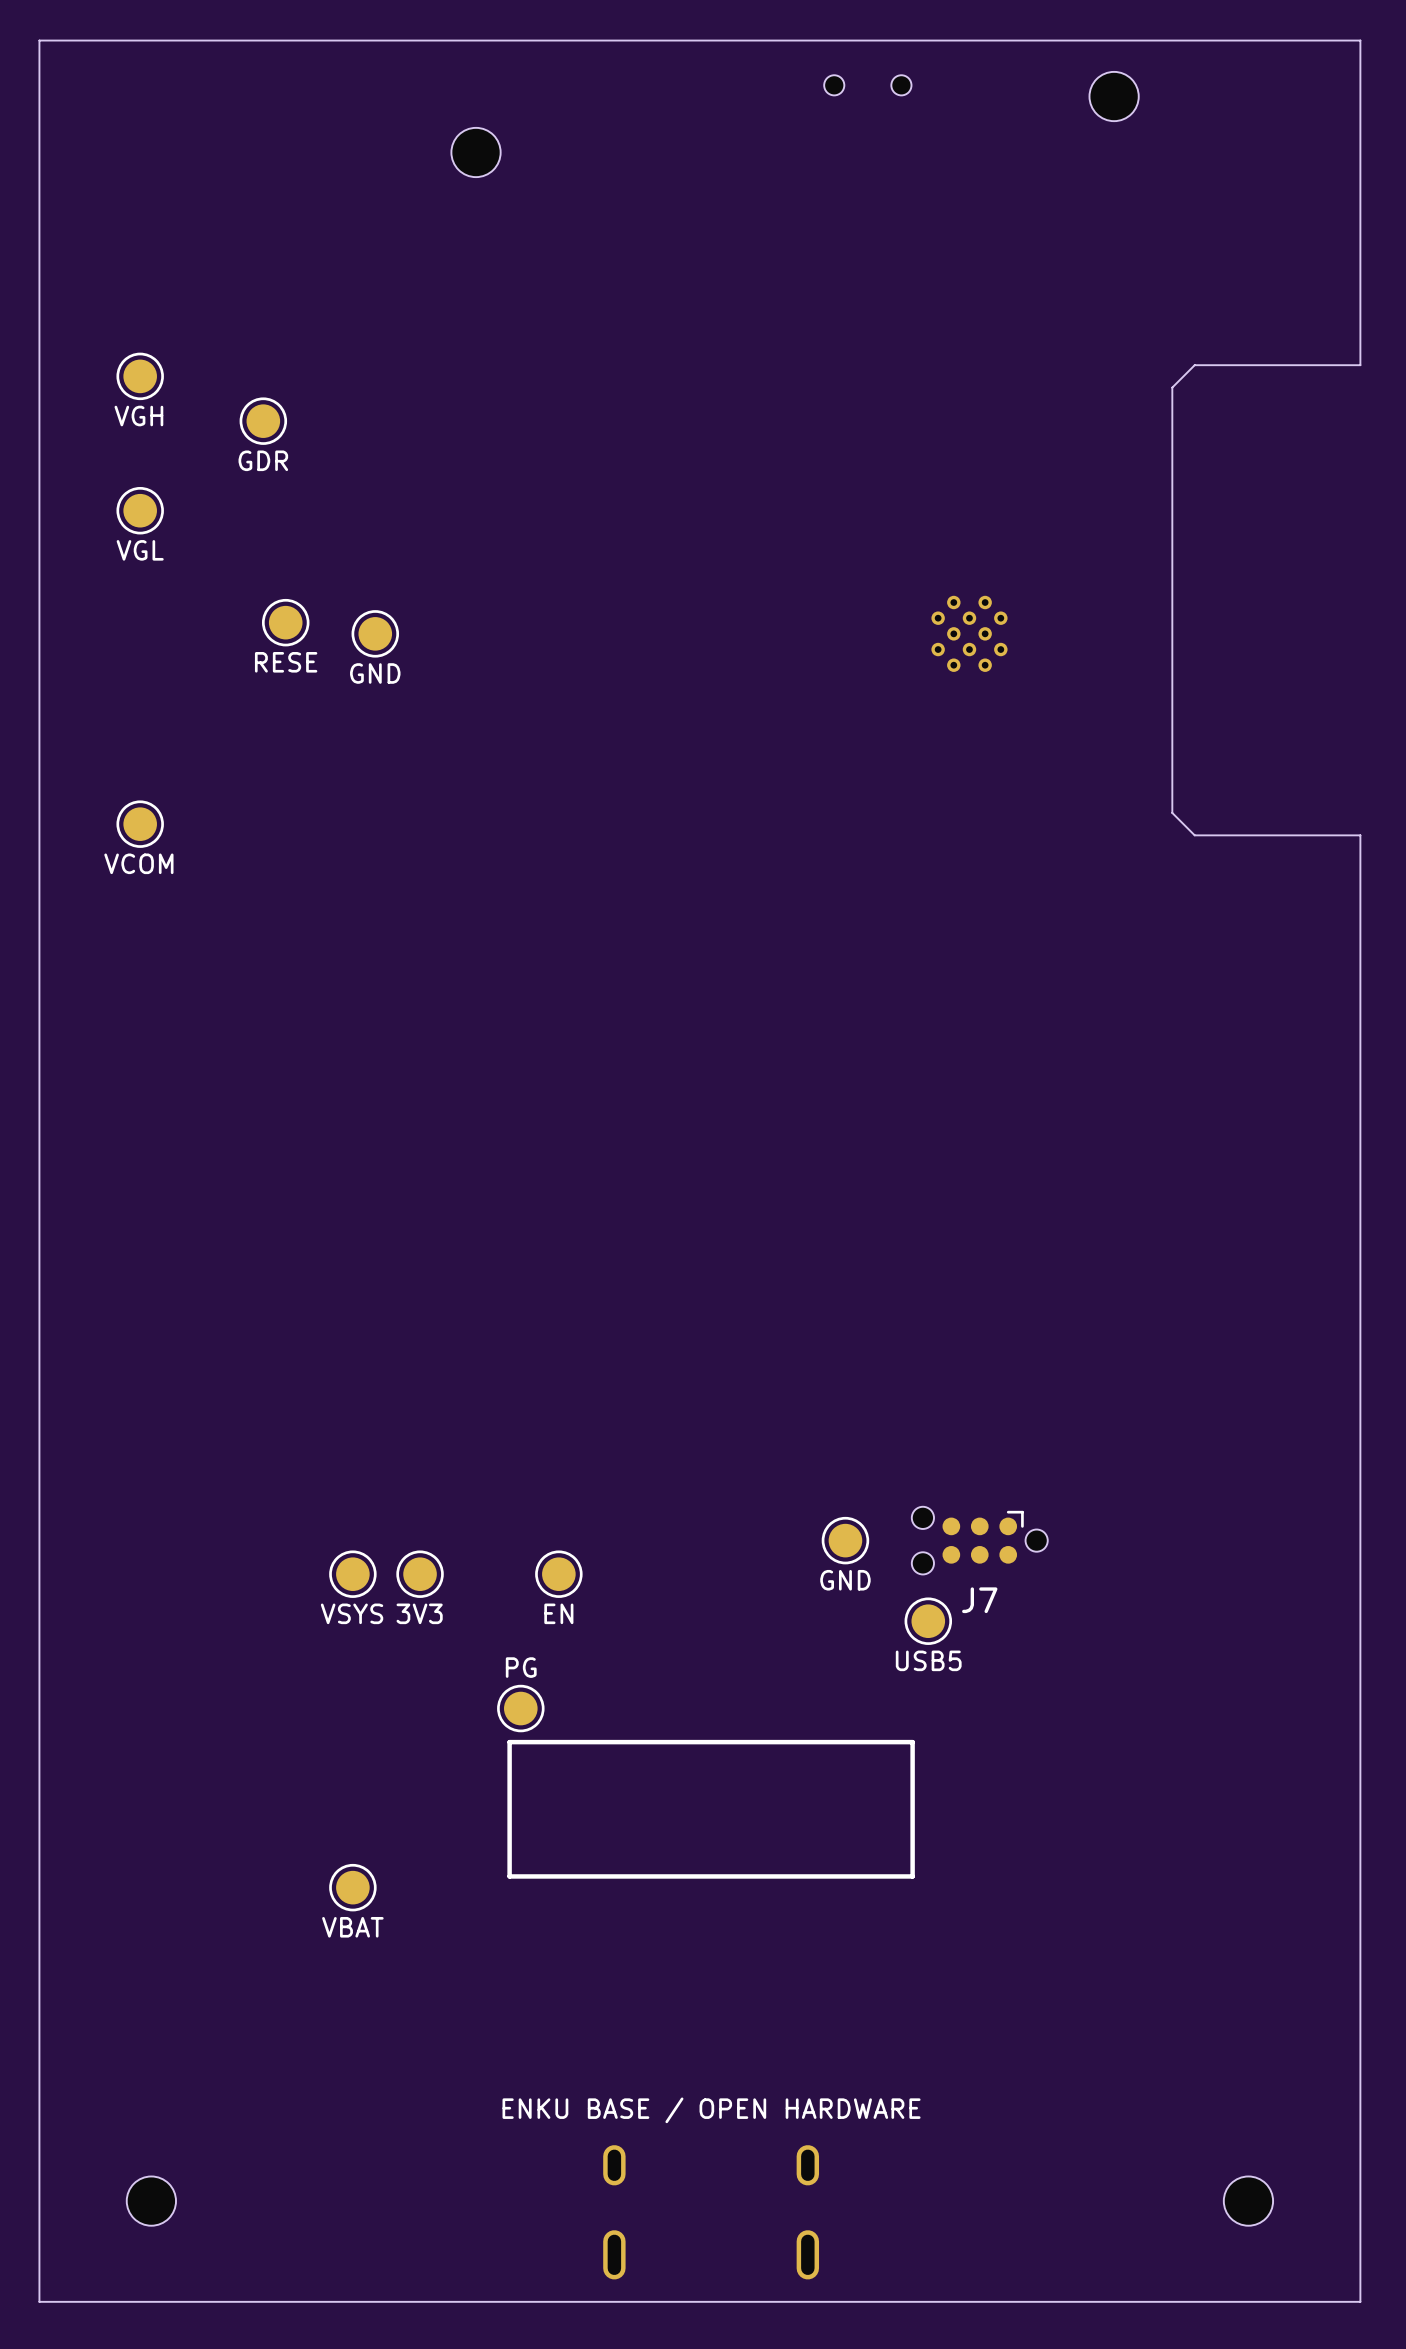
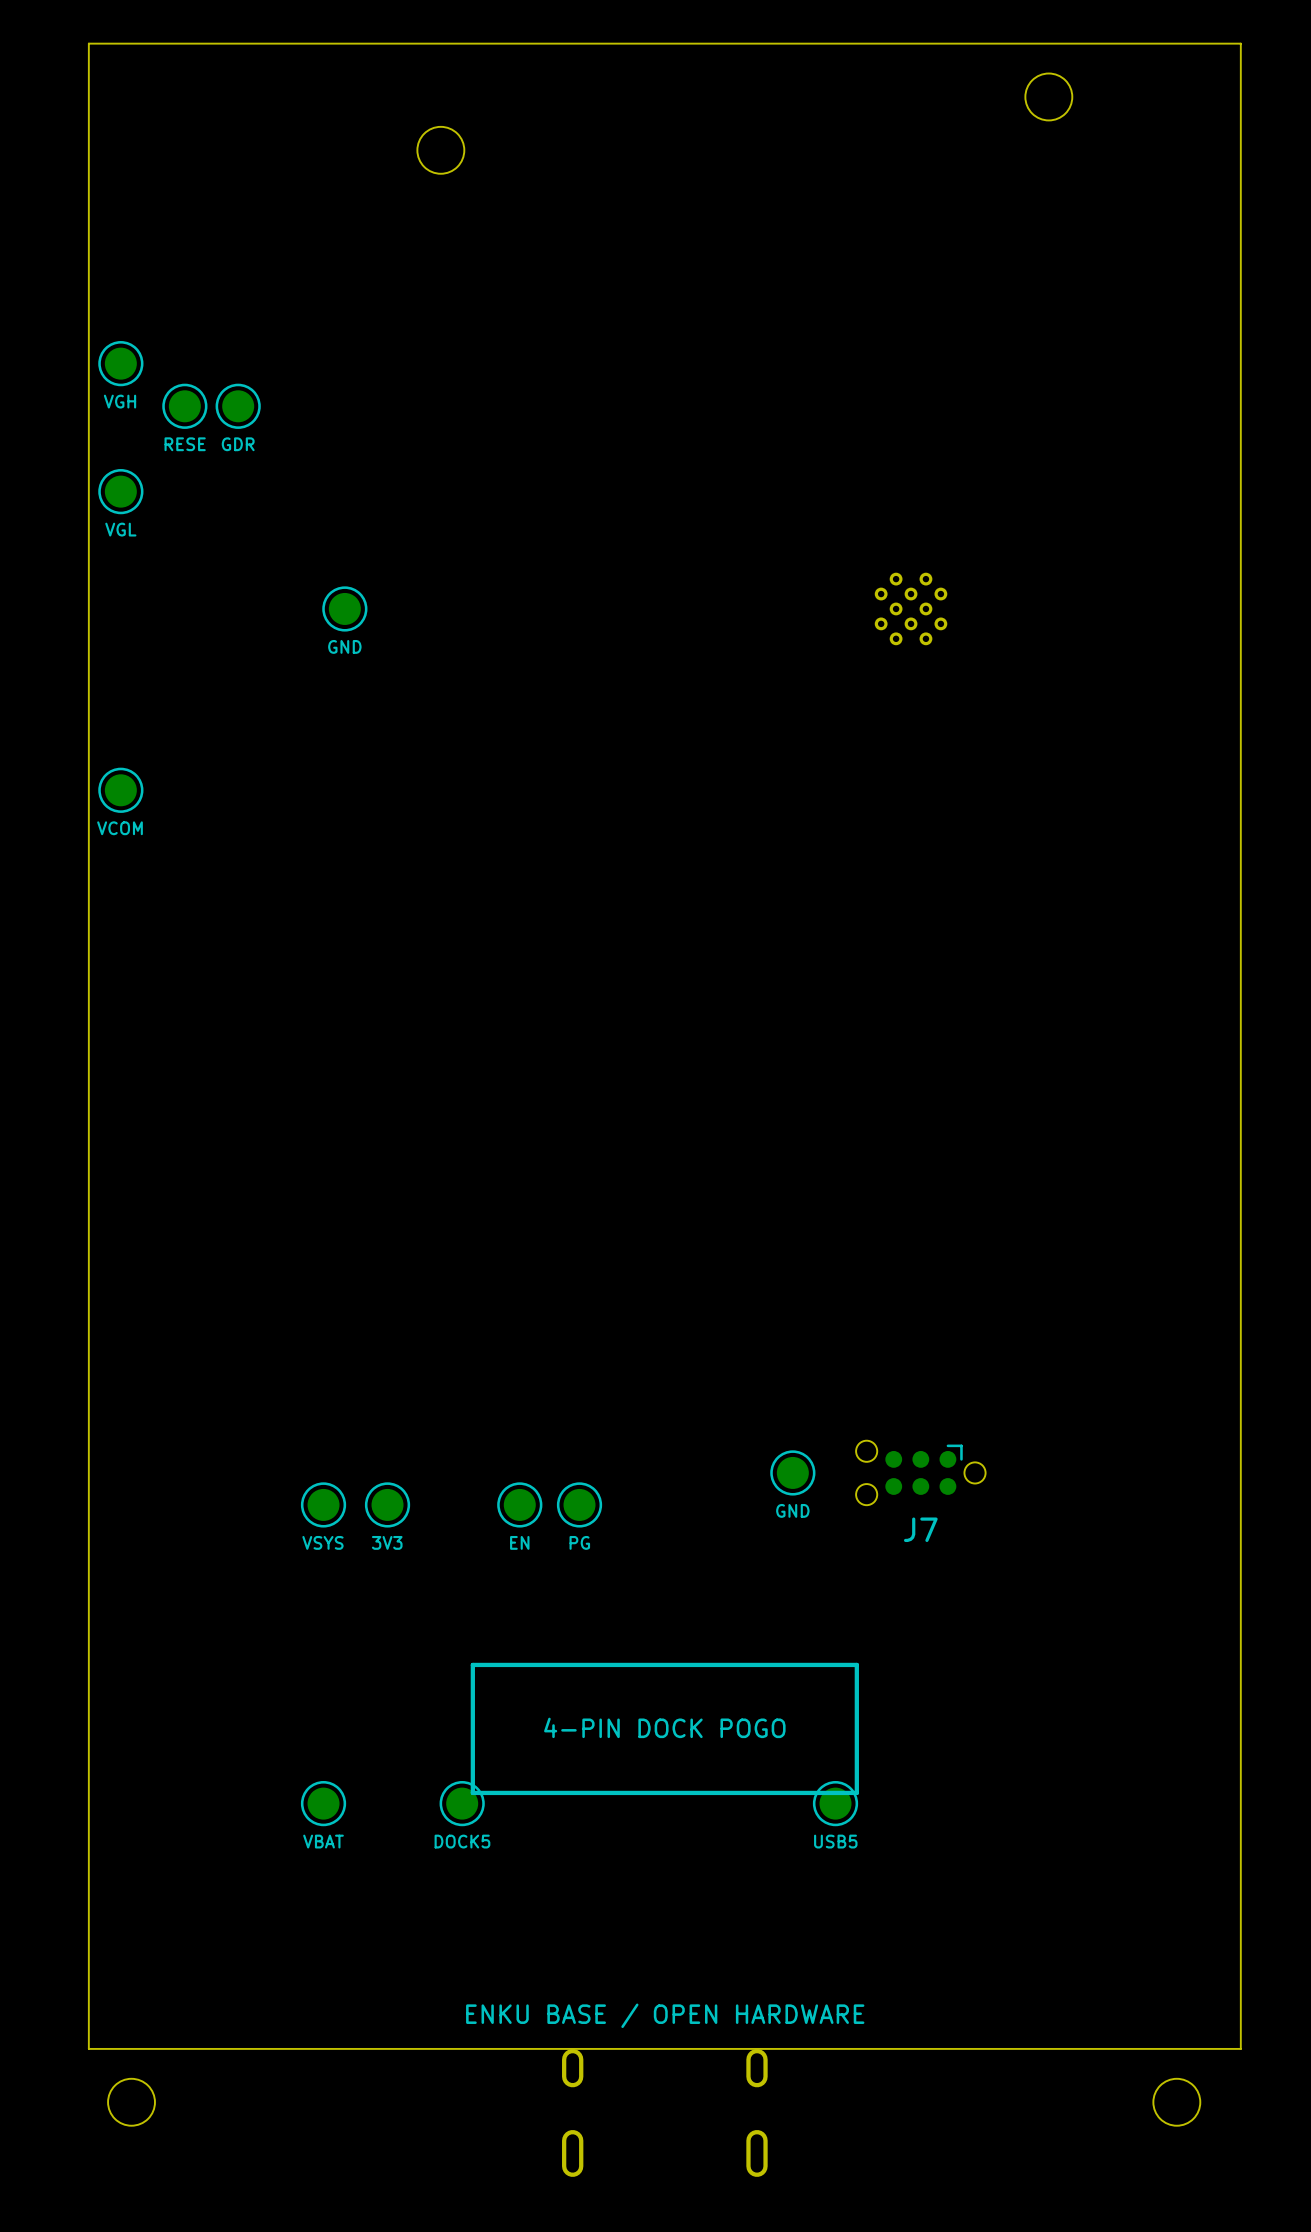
board edge: (1315, 40) (1360, 40) (1360, 365) (1194, 365) (1172, 387) (1172, 812) (1194, 835) (1360, 835) (1360, 2301) (39, 2301) (39, 40) (106, 40) -> (1240, 43) (1240, 2048) (88, 2048) (88, 43)
part: (867, 85) -> none
part text: VGH (138, 416) -> none
part text: none -> VGH (120, 401)
part: none -> (184, 406)
part text: GDR (263, 460) -> none
part text: none -> GDR (238, 444)
part text: none -> VGL (120, 529)
part text: VGL (140, 550) -> none
part: (285, 622) -> none
part text: none -> GND (344, 646)
part text: GND (375, 673) -> none
part text: VCOM (138, 863) -> none
part text: none -> VCOM (120, 828)
part: none -> (579, 1504)
part text: none -> GND (792, 1510)
part text: GND (845, 1580) -> none
part text: VSYS (352, 1613) -> none
part text: 3V3 (419, 1613) -> none
part text: EN (558, 1613) -> none
part text: none -> VSYS (322, 1542)
part text: none -> 3V3 (387, 1542)
part text: none -> EN (519, 1542)
part: (928, 1621) -> none
part: (520, 1708) -> none
text: none -> 4-PIN DOCK POGO (664, 1727)
part: none -> (462, 1803)
part: none -> (835, 1803)
part text: none -> VBAT (323, 1841)
part text: VBAT (352, 1927) -> none

